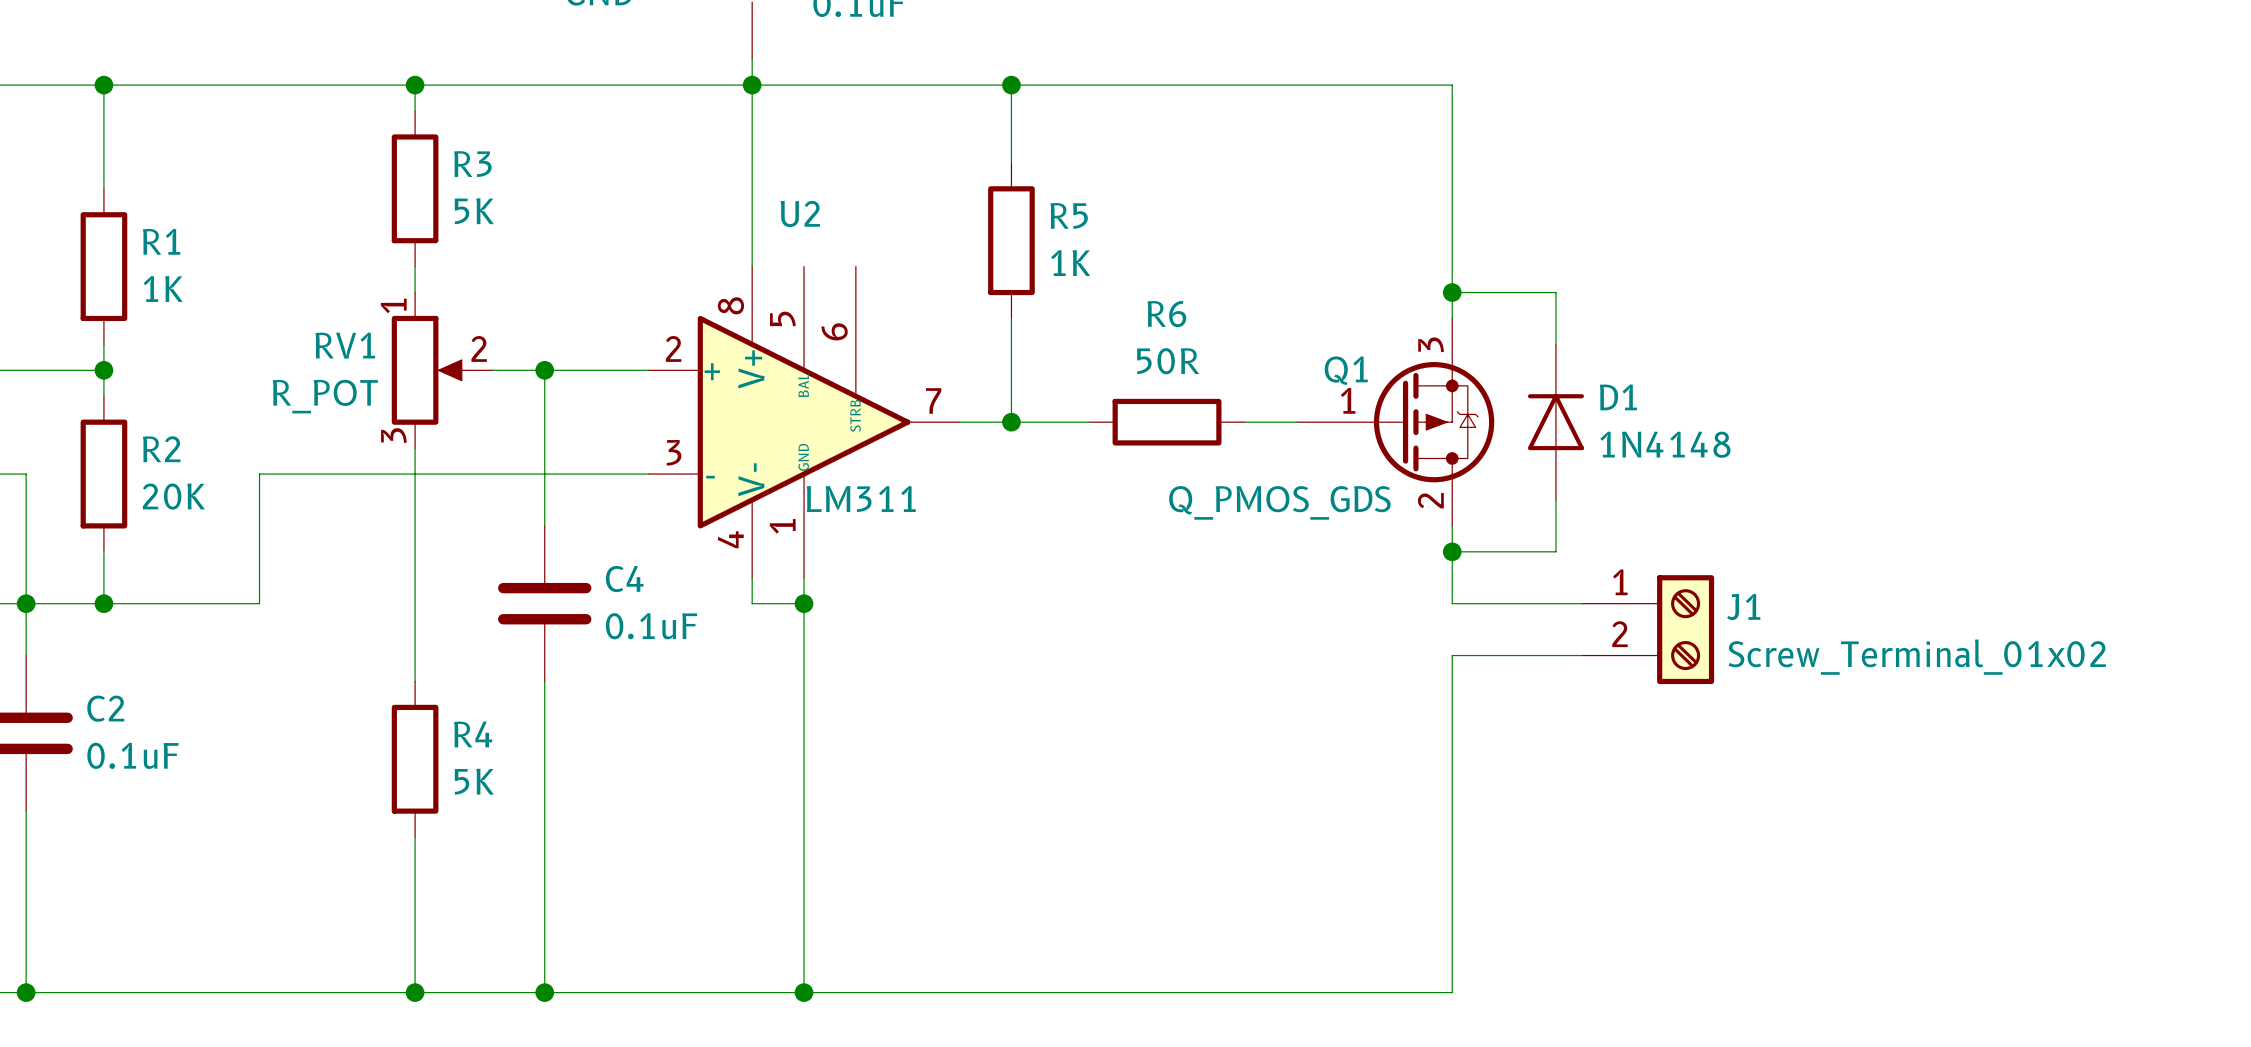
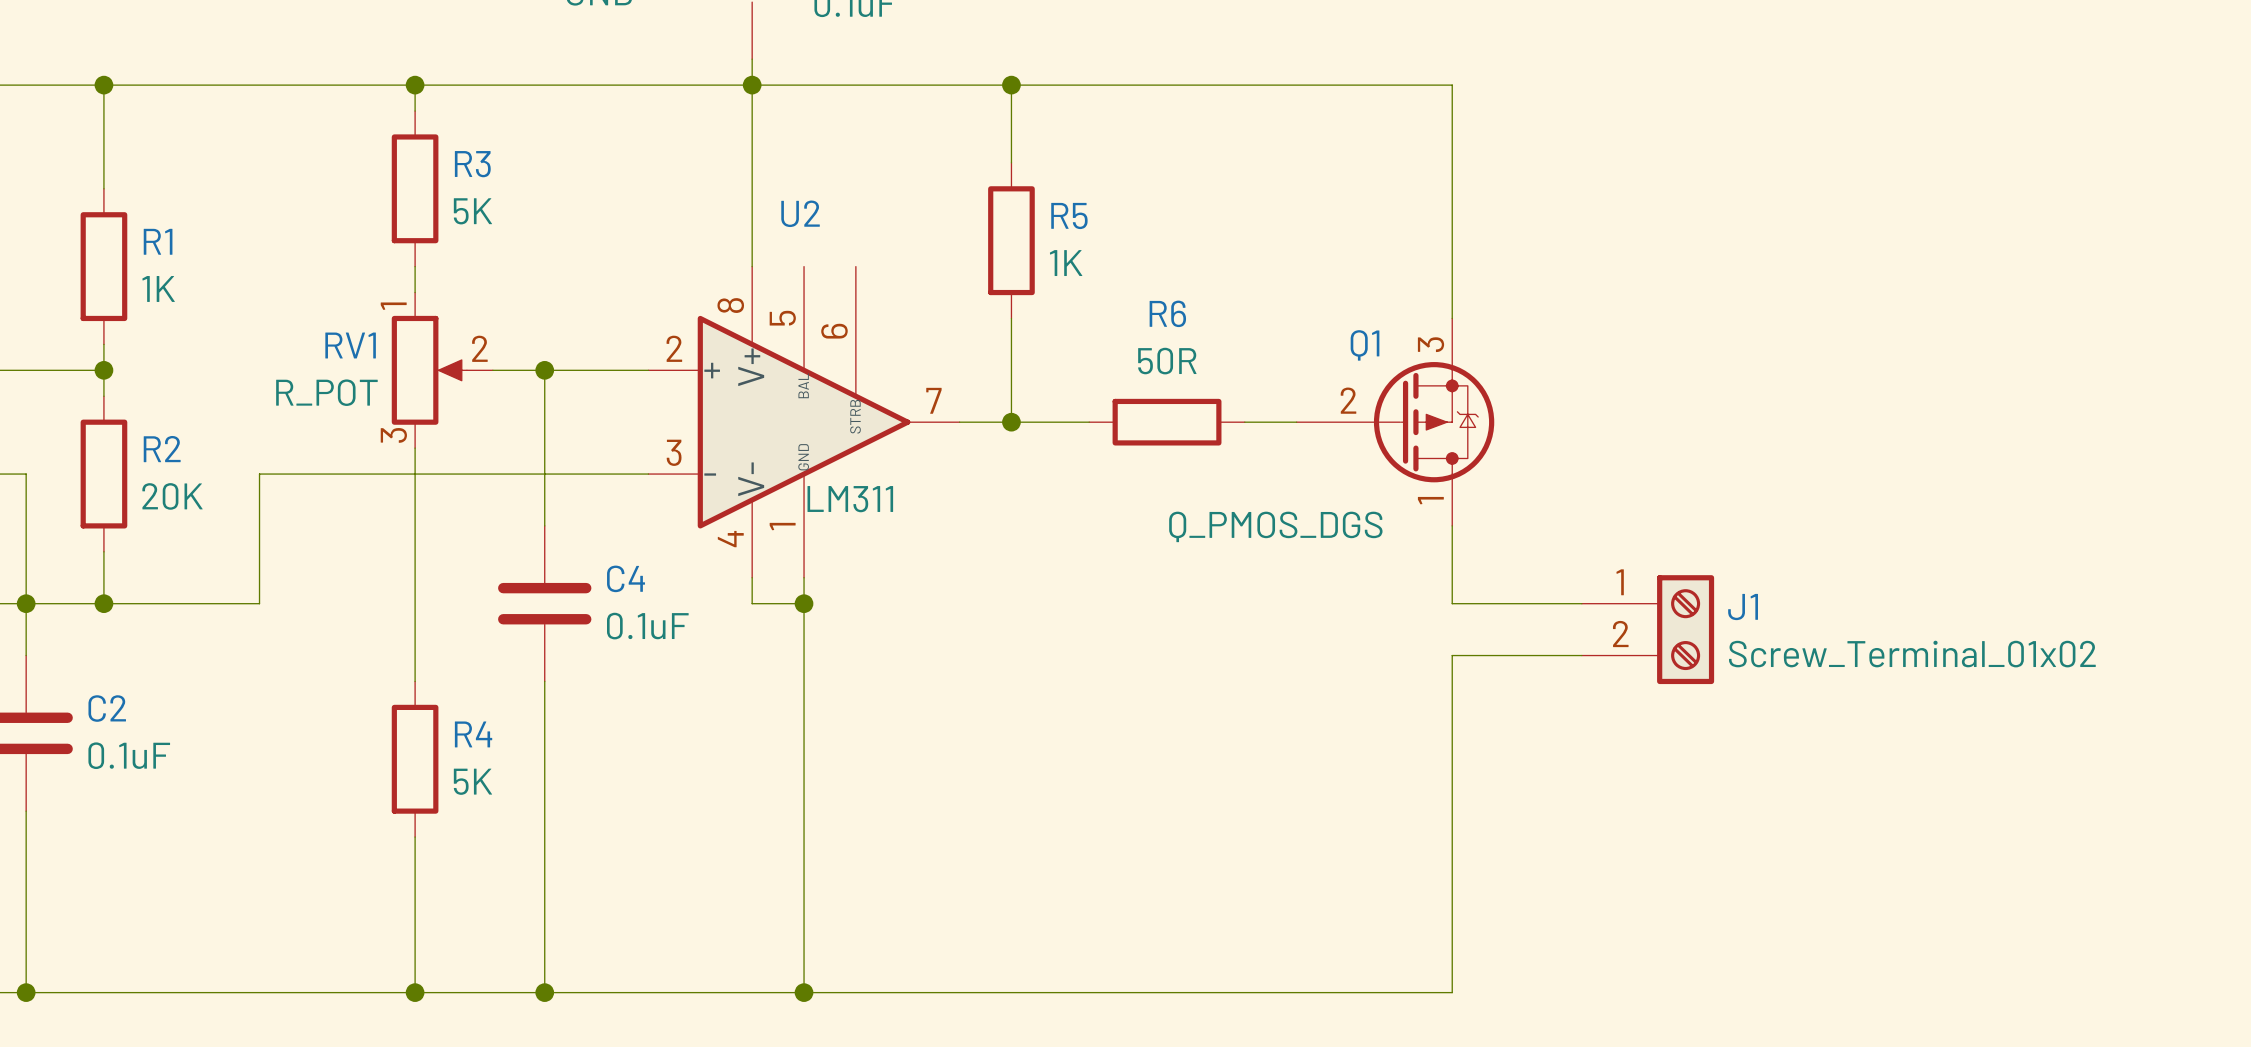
wire: (1452, 292) (1555, 292) (1555, 344) -> none
junction: (1452, 292) -> none
Q1 name position: Q1 (1346, 370) -> Q1 (1365, 345)
Q1 pin number: 1 (1348, 400) -> 2 (1348, 400)
D1: 1N4148 (1555, 422) -> none
wire: (1555, 499) (1555, 551) (1452, 551) -> none
Q1 pin number: 2 (1430, 500) -> 1 (1430, 500)
Q1 value: Q_PMOS_GDS (1279, 502) -> Q_PMOS_DGS (1275, 526)
junction: (1452, 551) -> none

